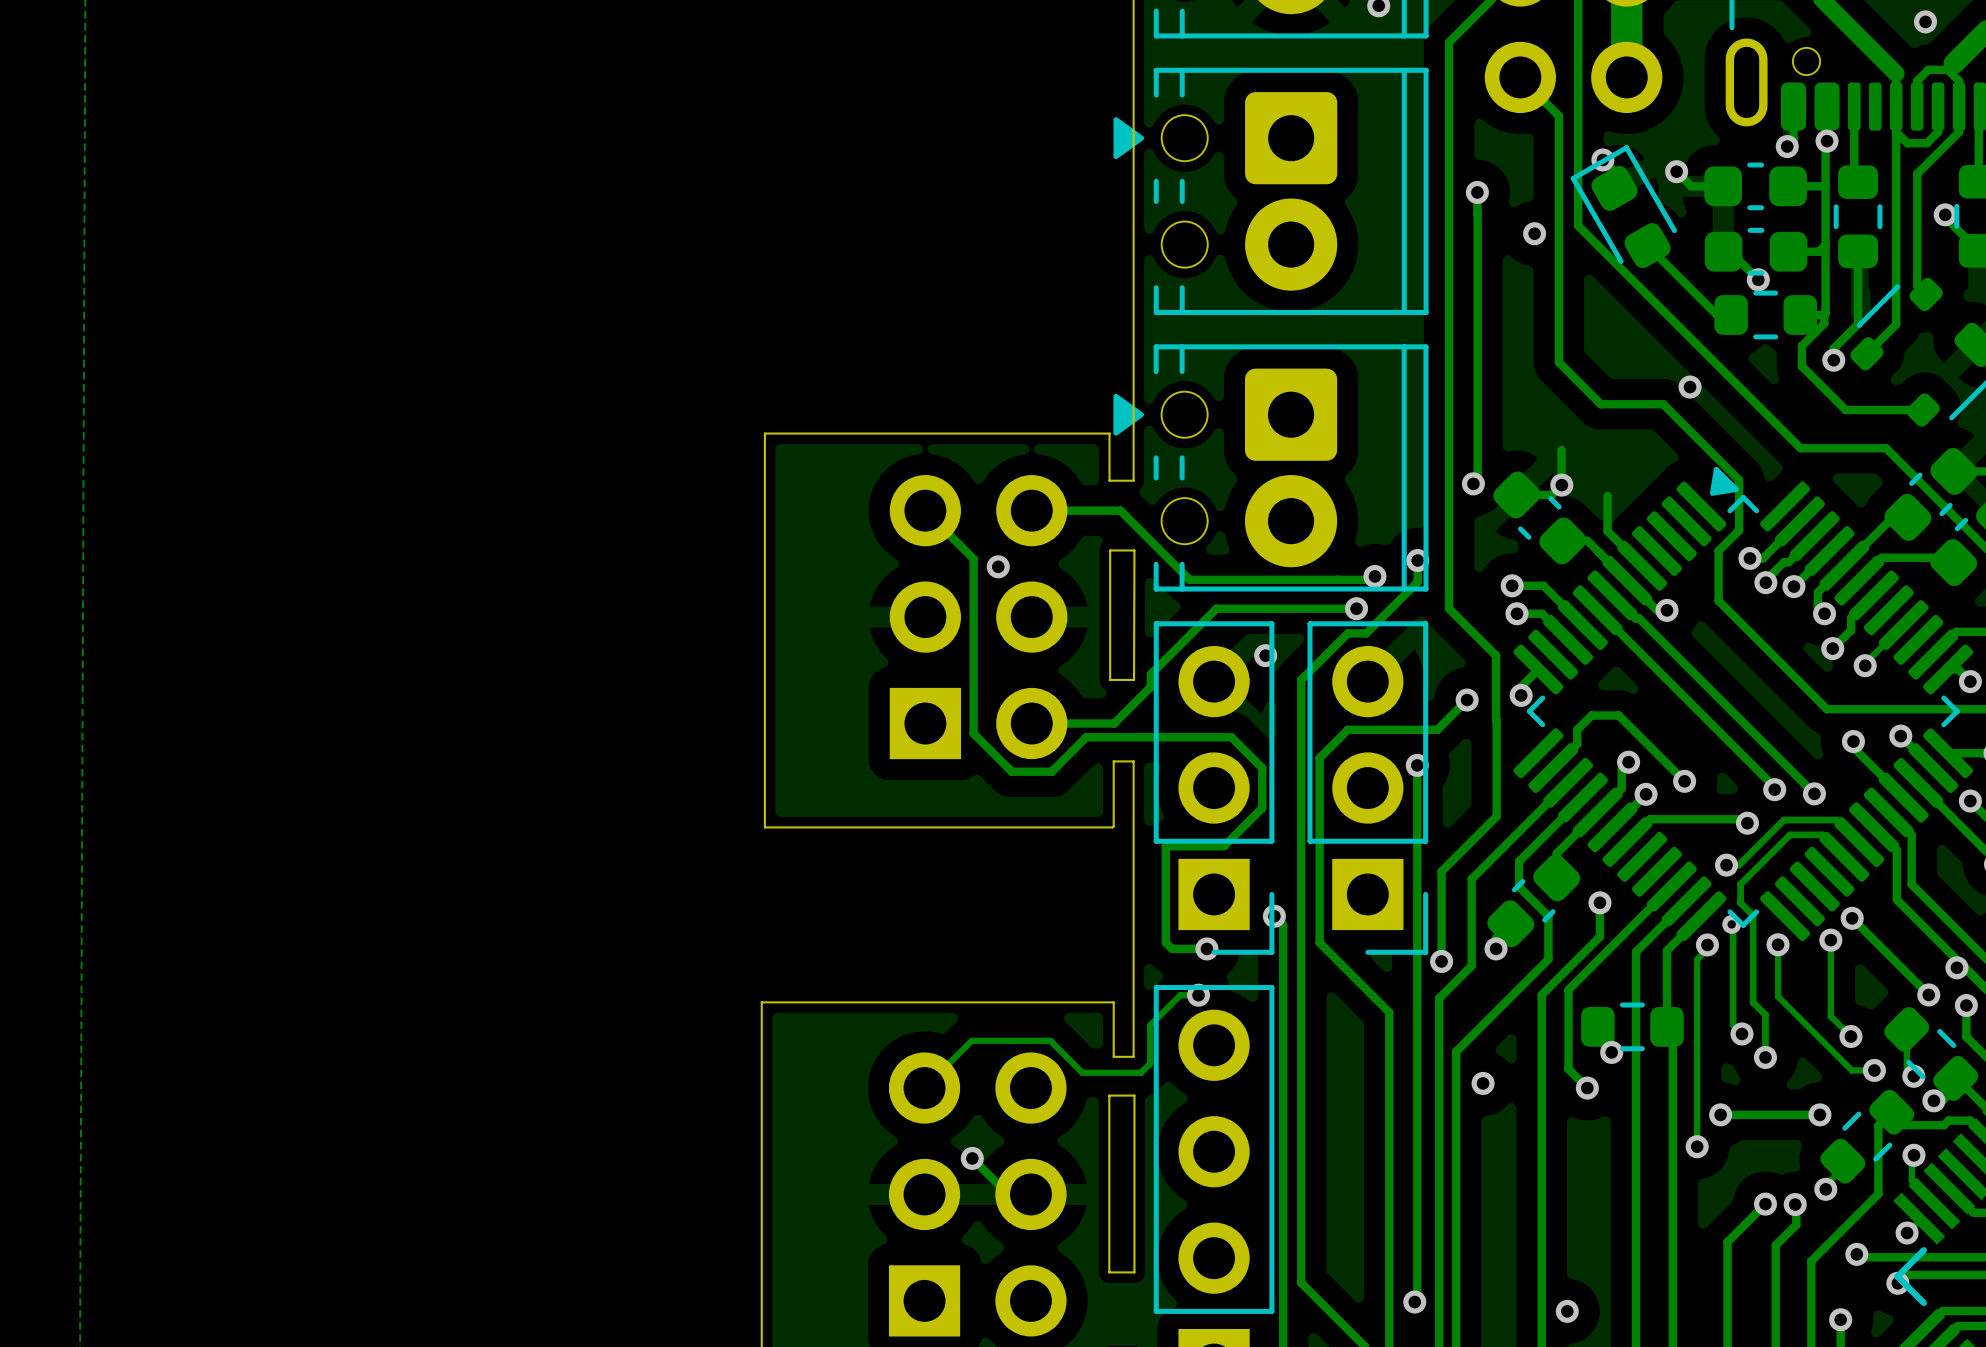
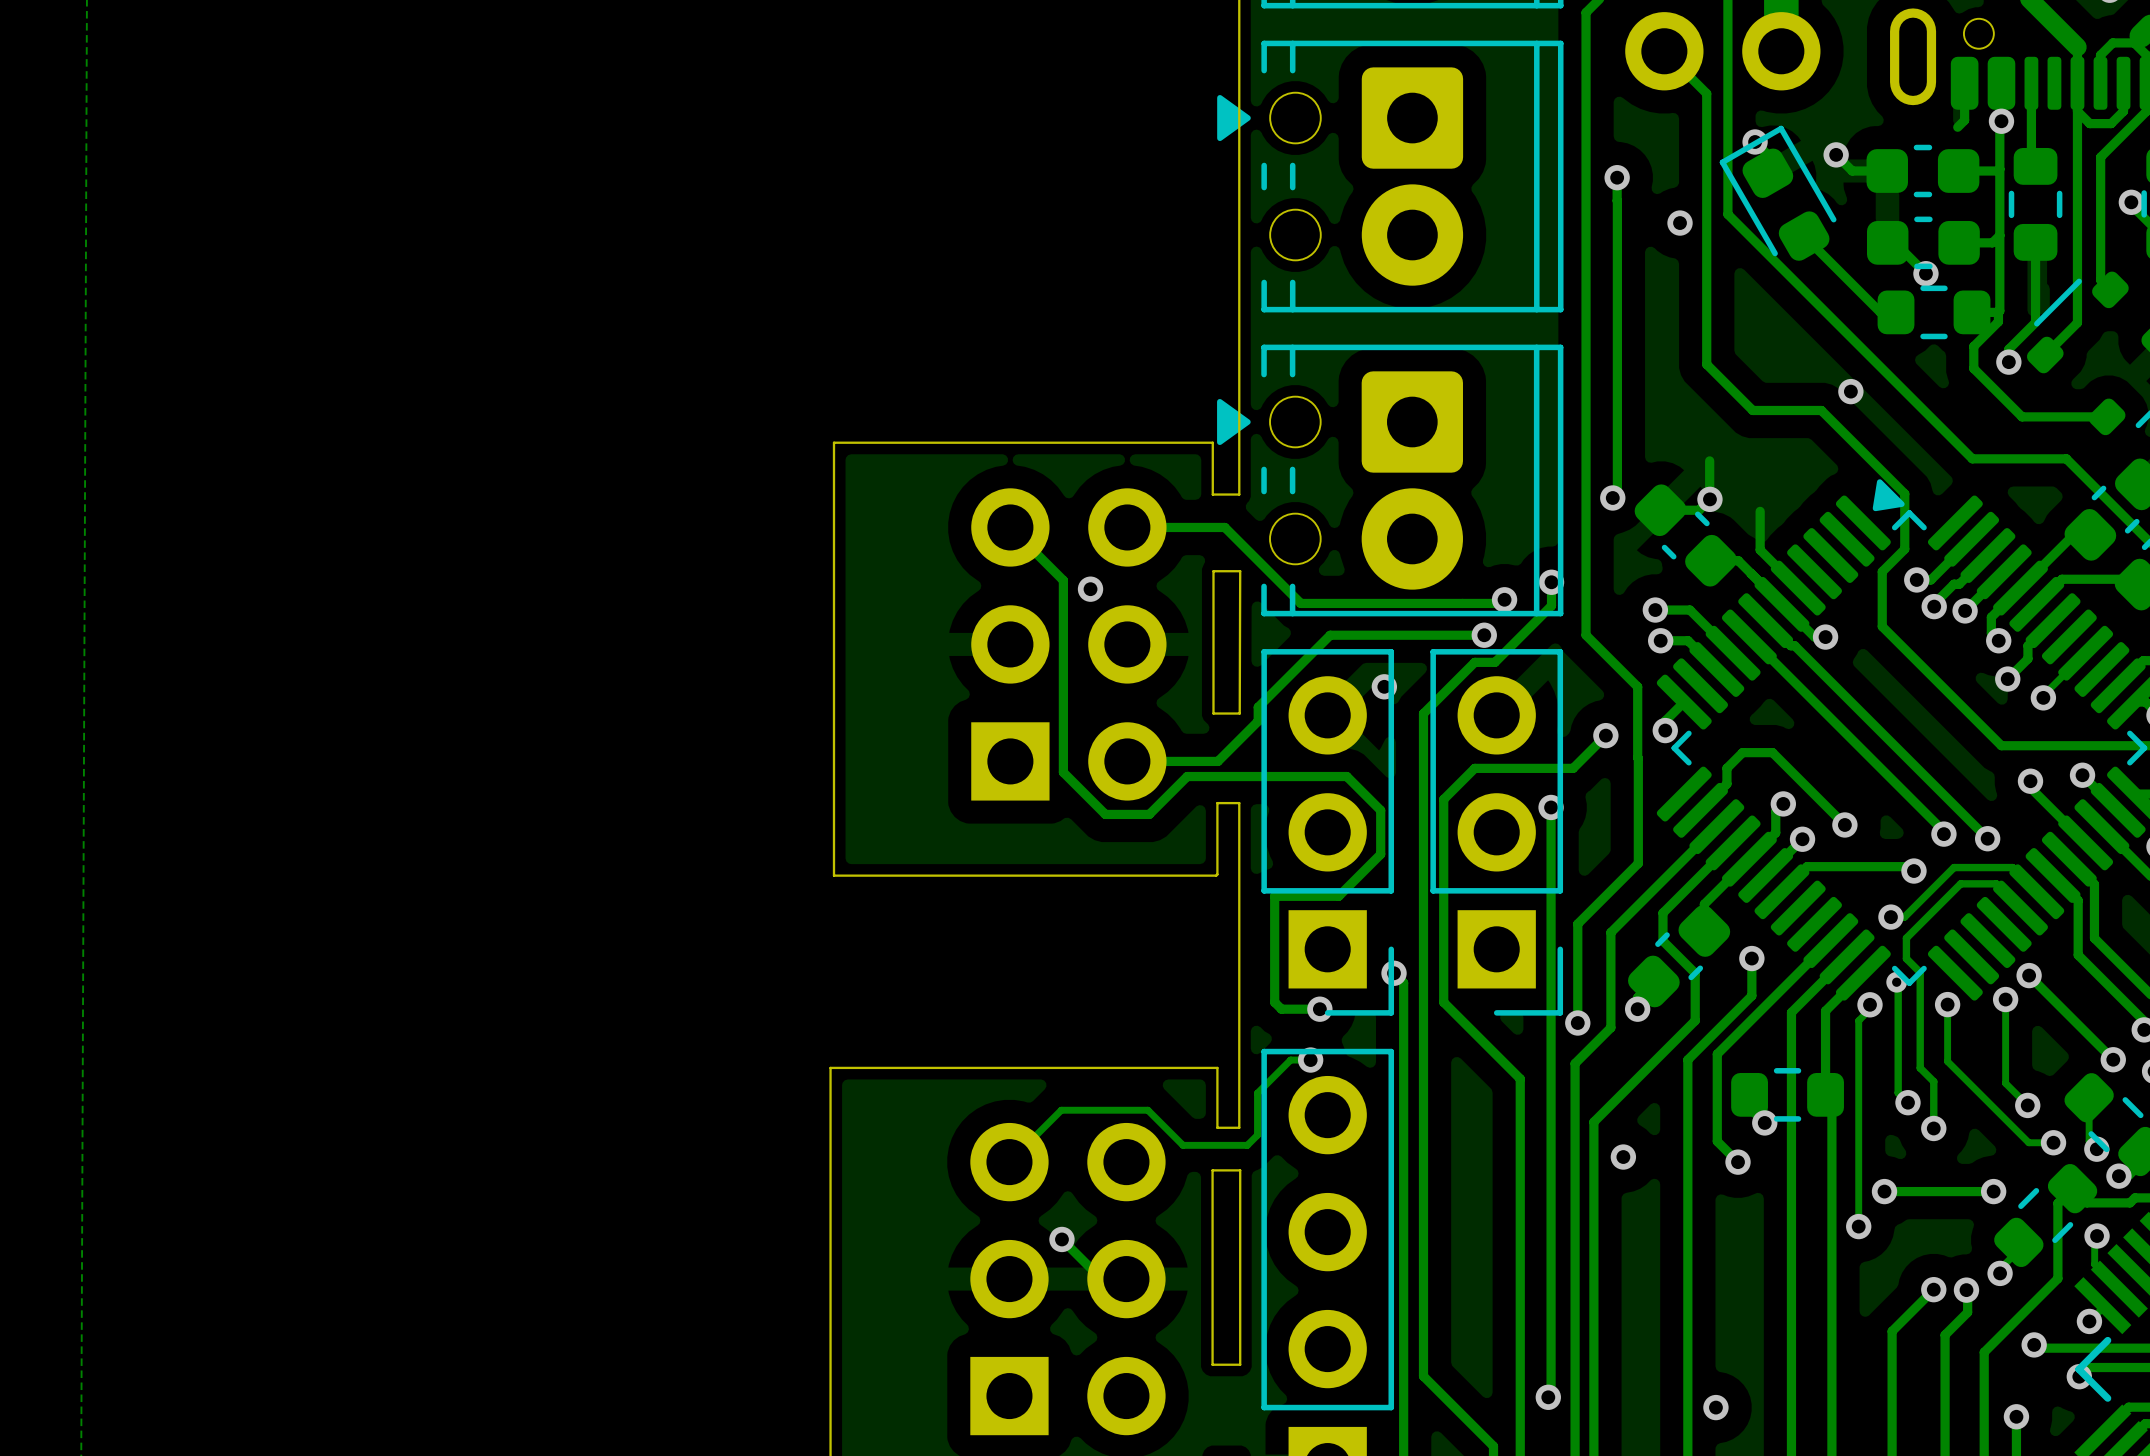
via: (1787, 146) -> none

